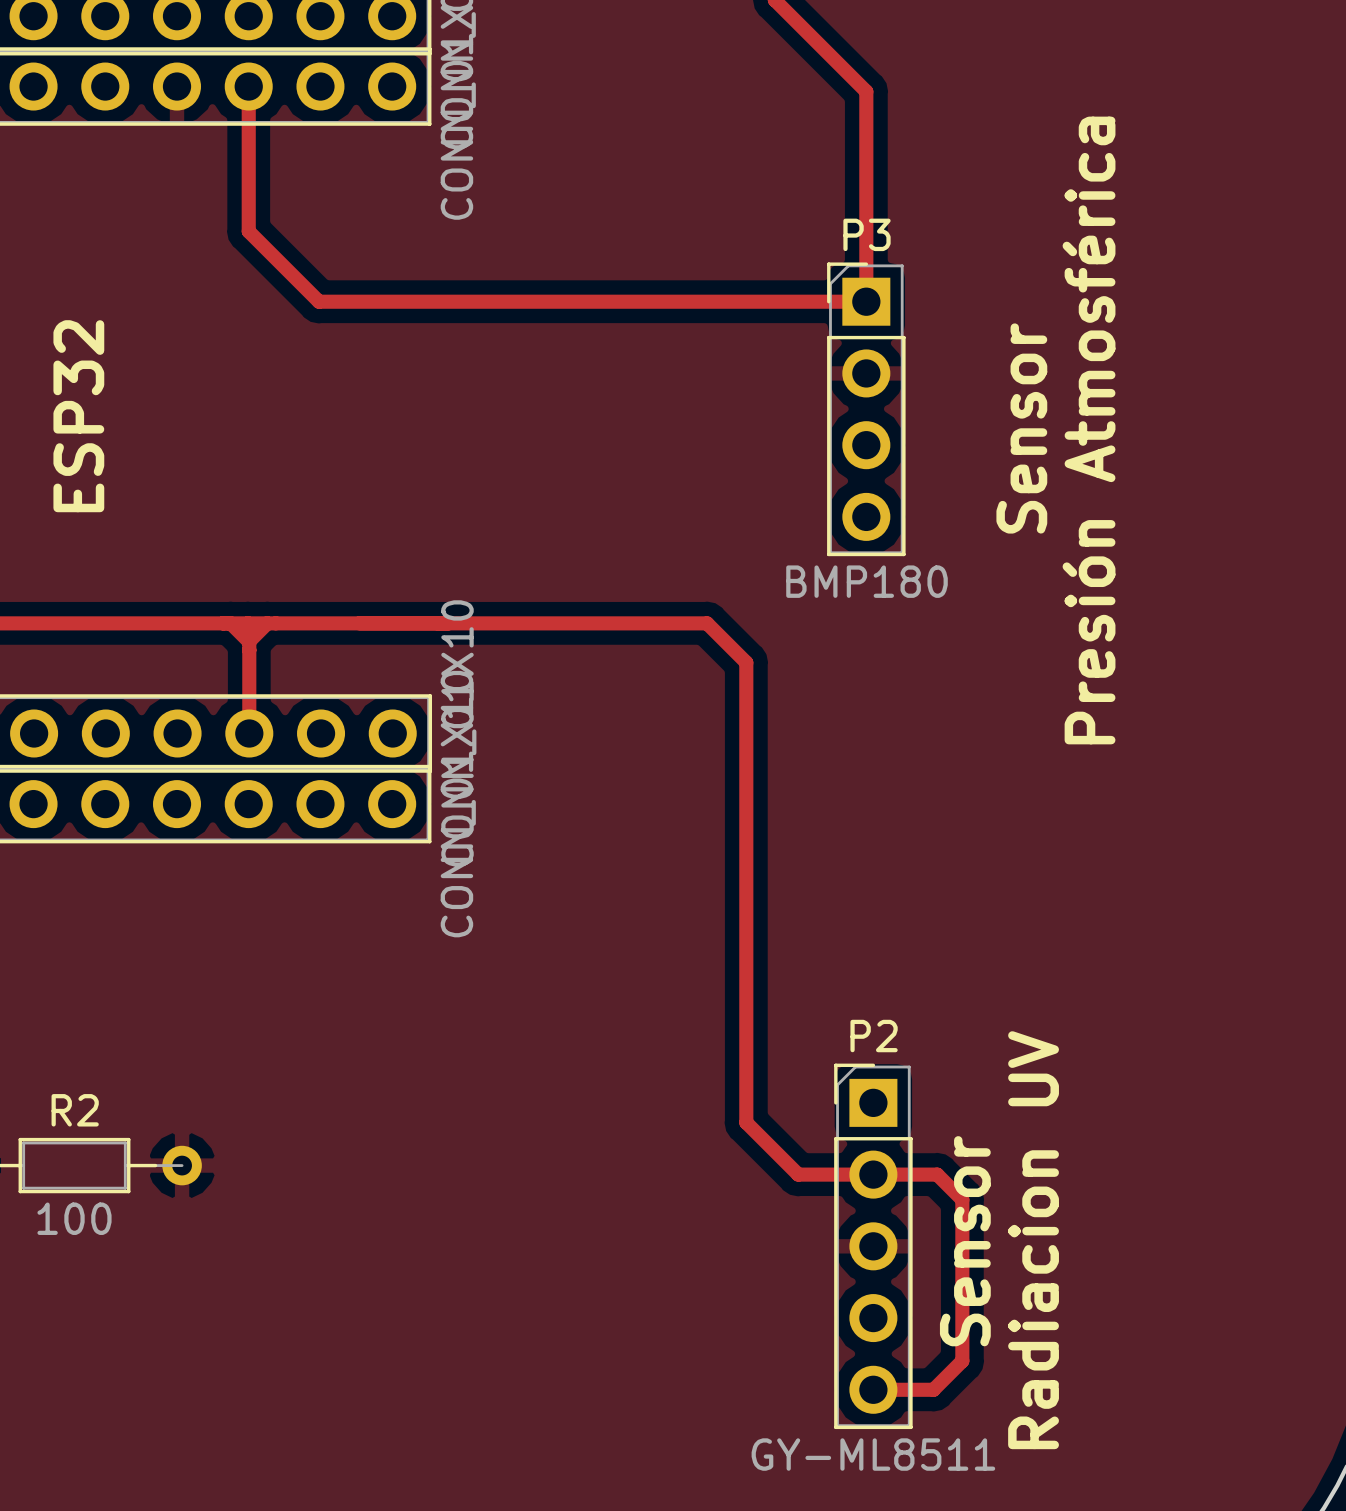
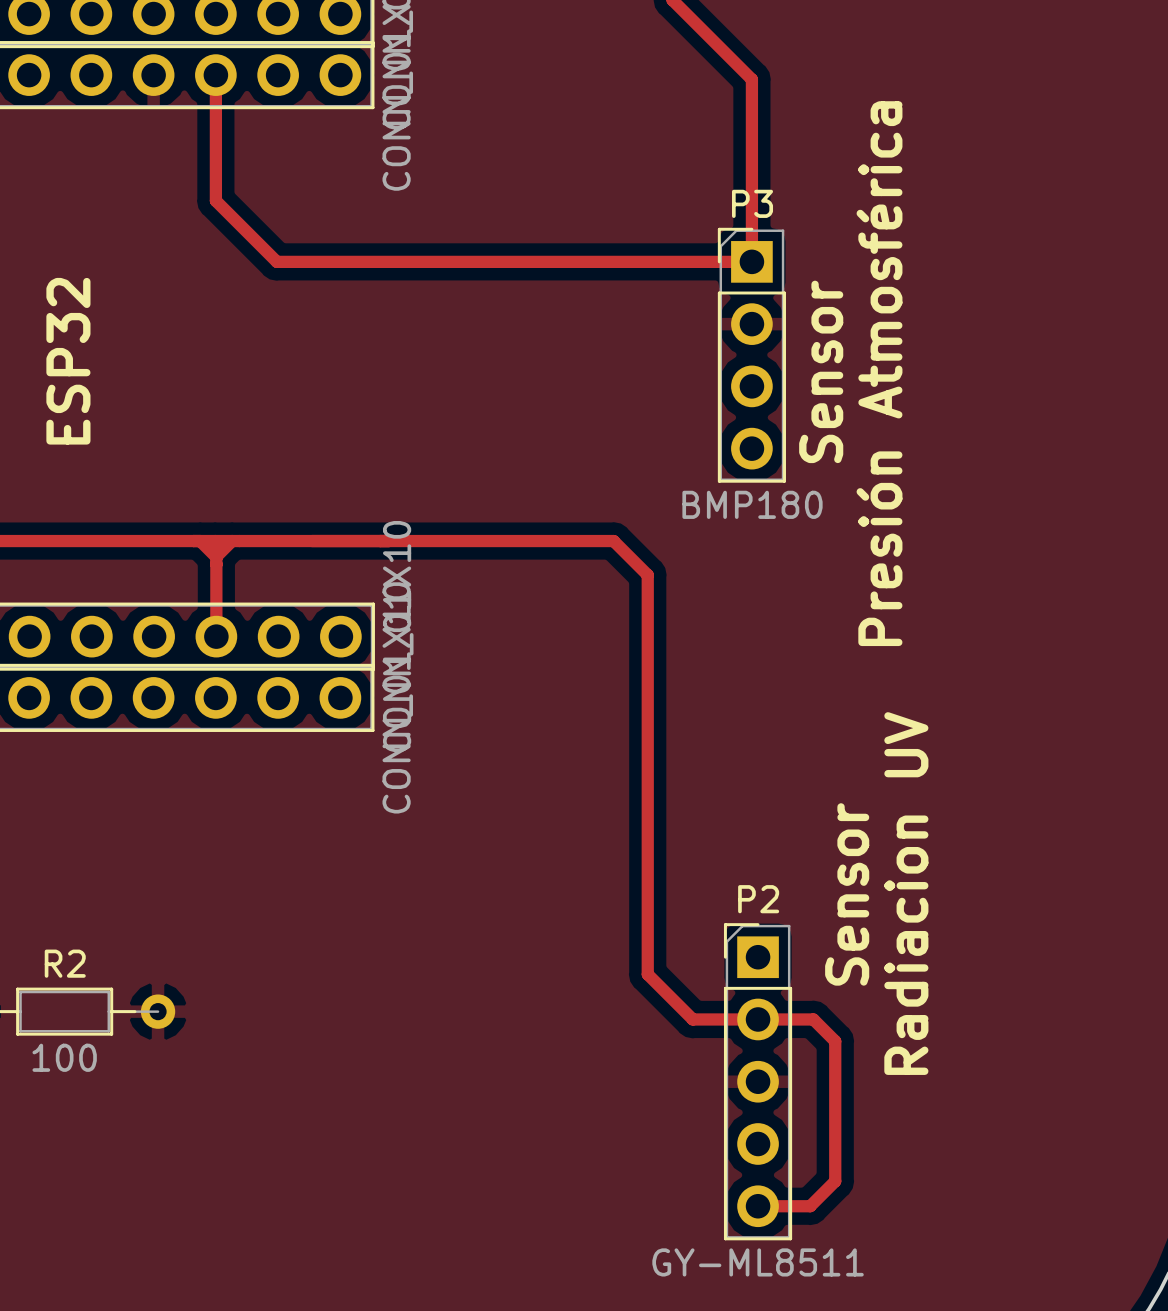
text position: Sensor (1021, 428) -> Sensor (821, 371)
text position: Presión Atmosférica (1089, 430) -> Presión Atmosférica (879, 373)
text position: Radiacion UV (1033, 1240) -> Radiacion UV (906, 893)
text position: Sensor (965, 1241) -> Sensor (847, 894)

